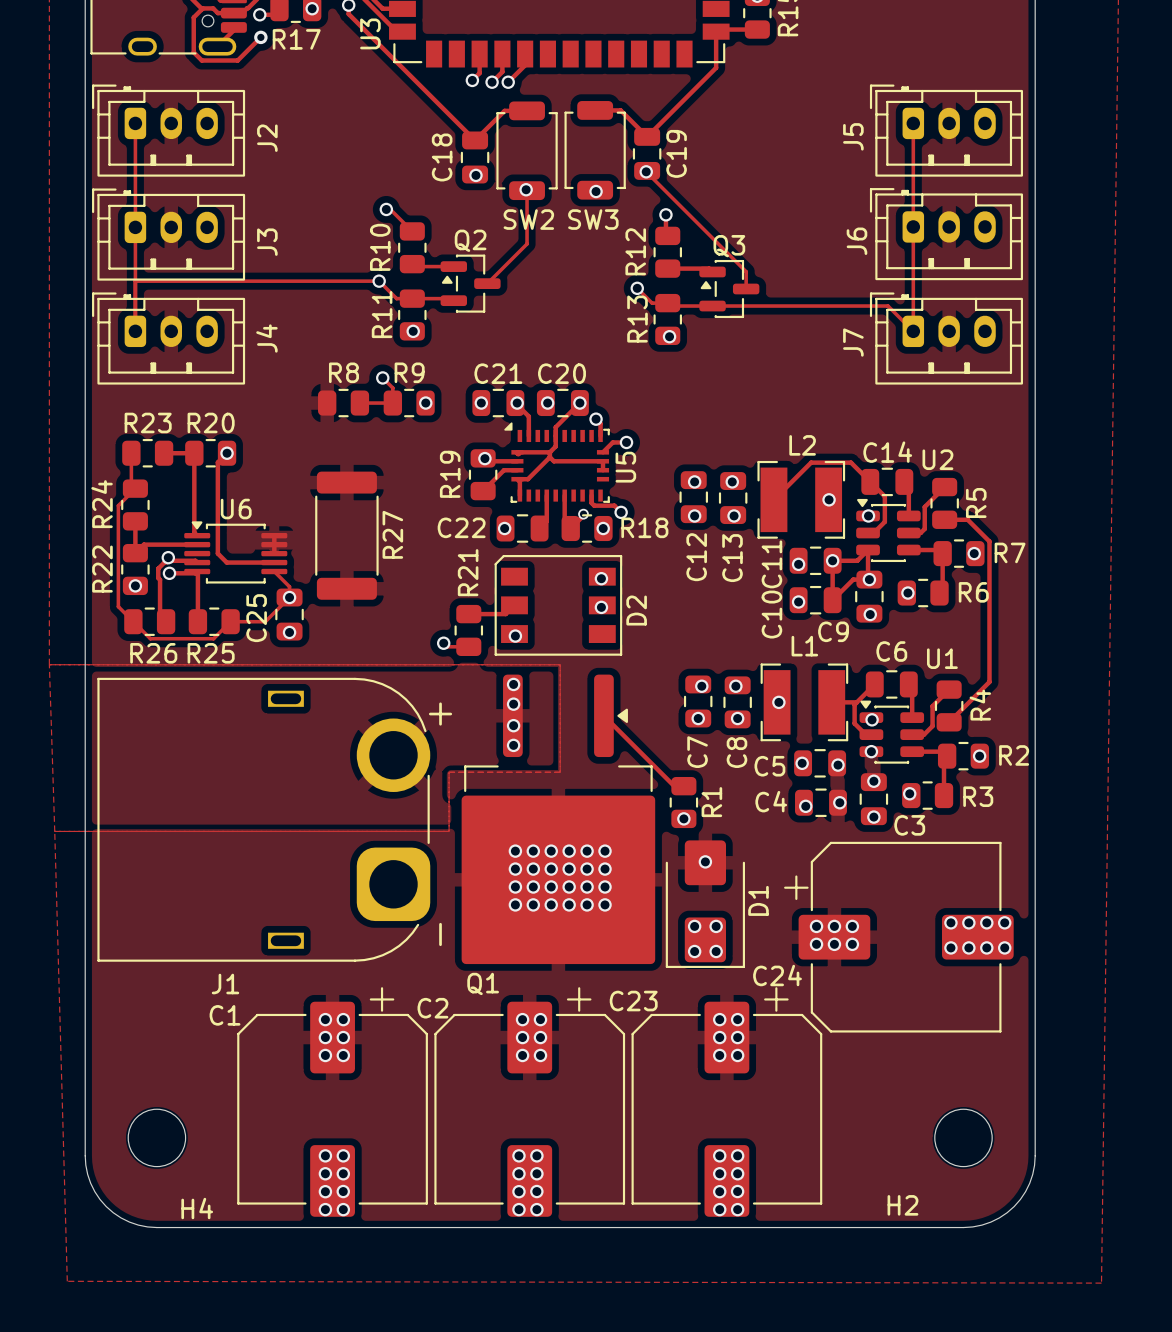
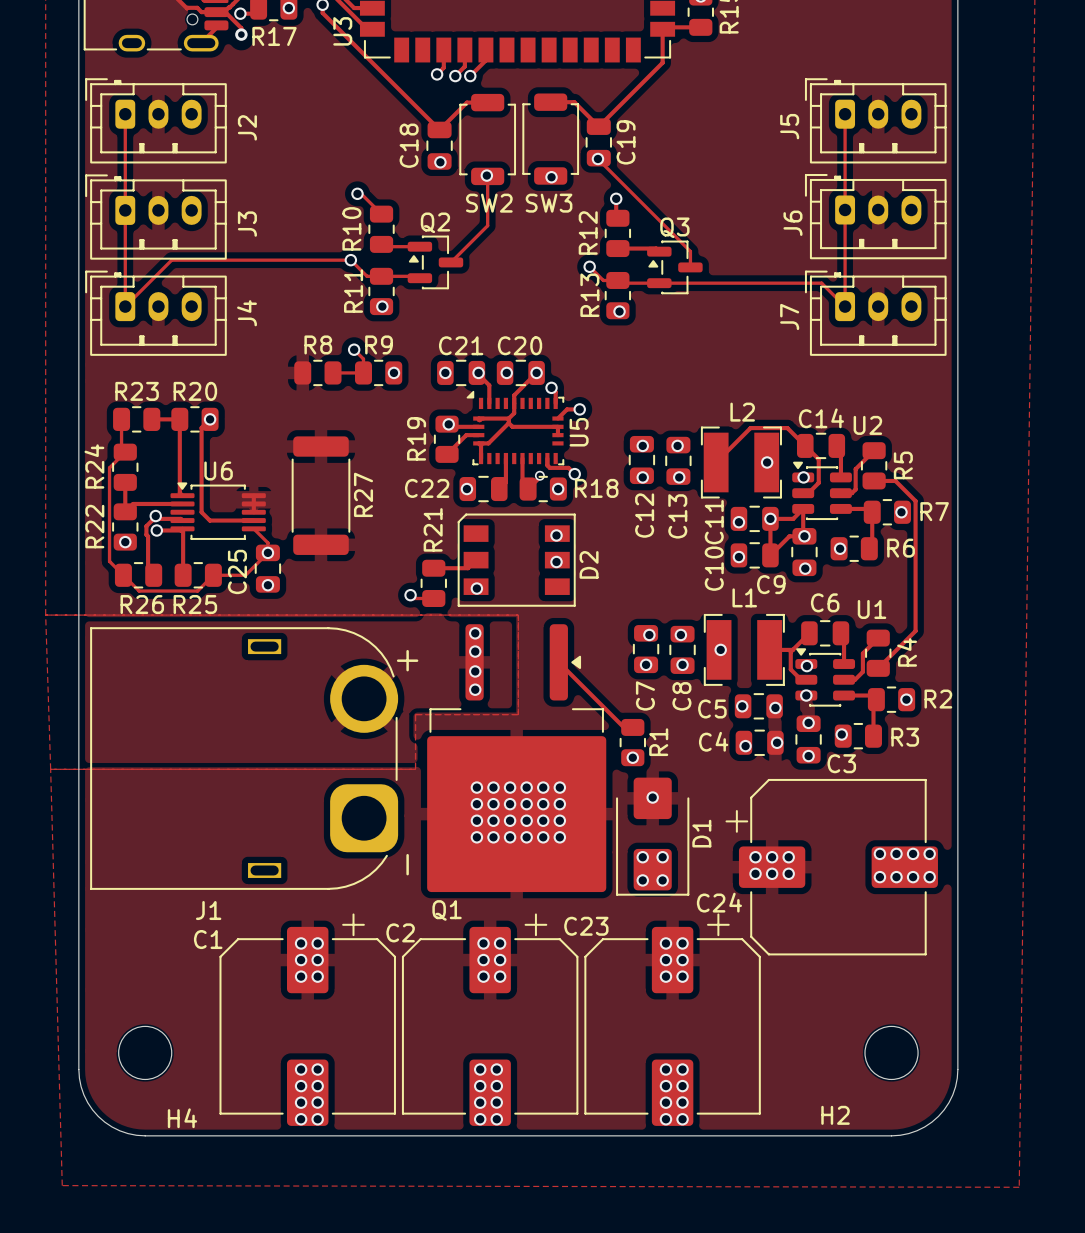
track: (202, 9) (193, 17) (193, 52) (201, 60) (237, 60) (260, 37) -> none
track: none -> (224, 12) (241, 28) (241, 37)
track: (135, 281) (185, 281) -> (125, 306) (171, 260)

